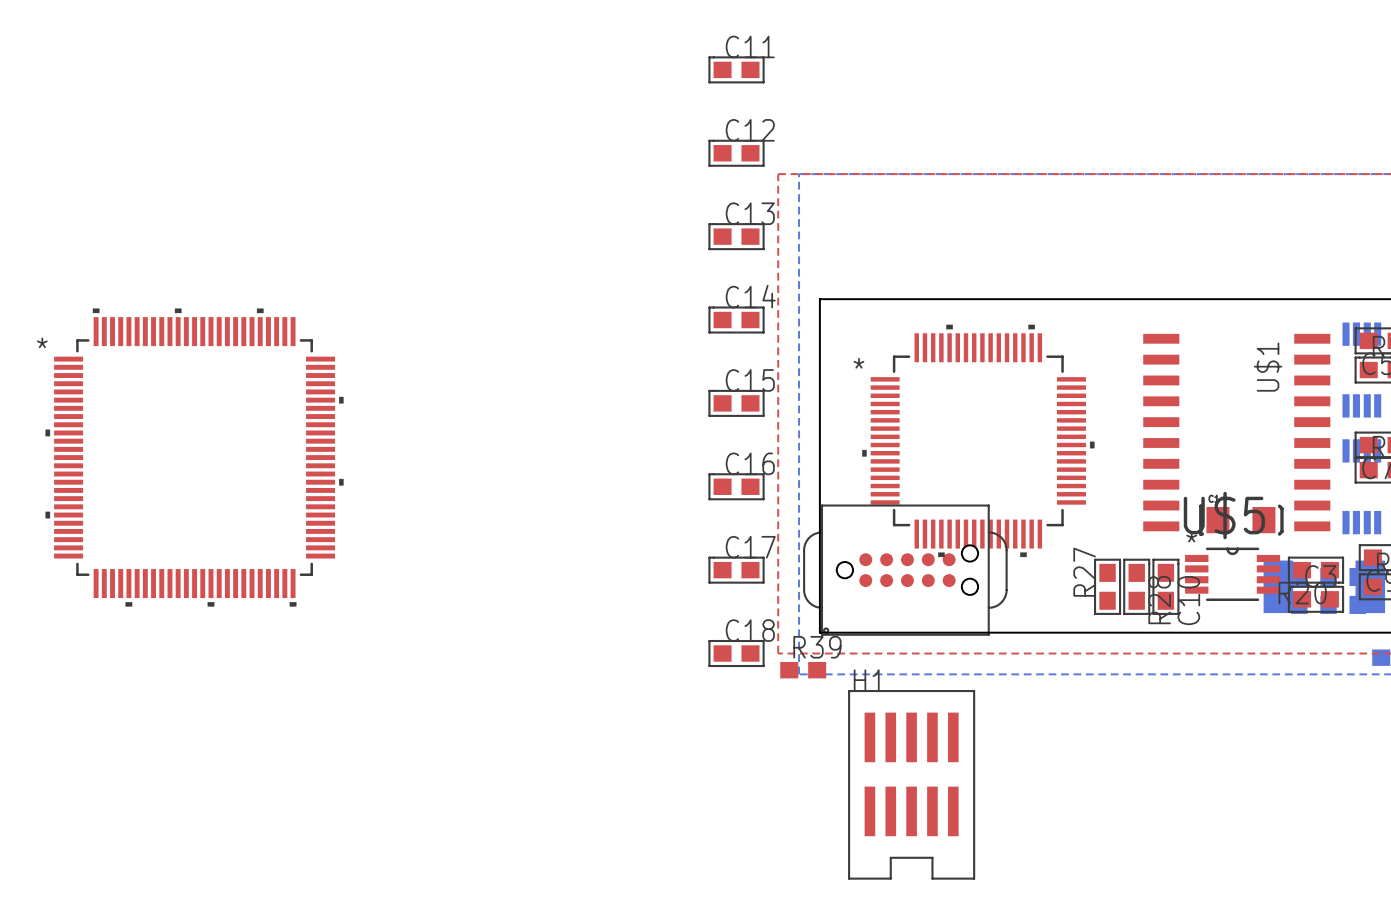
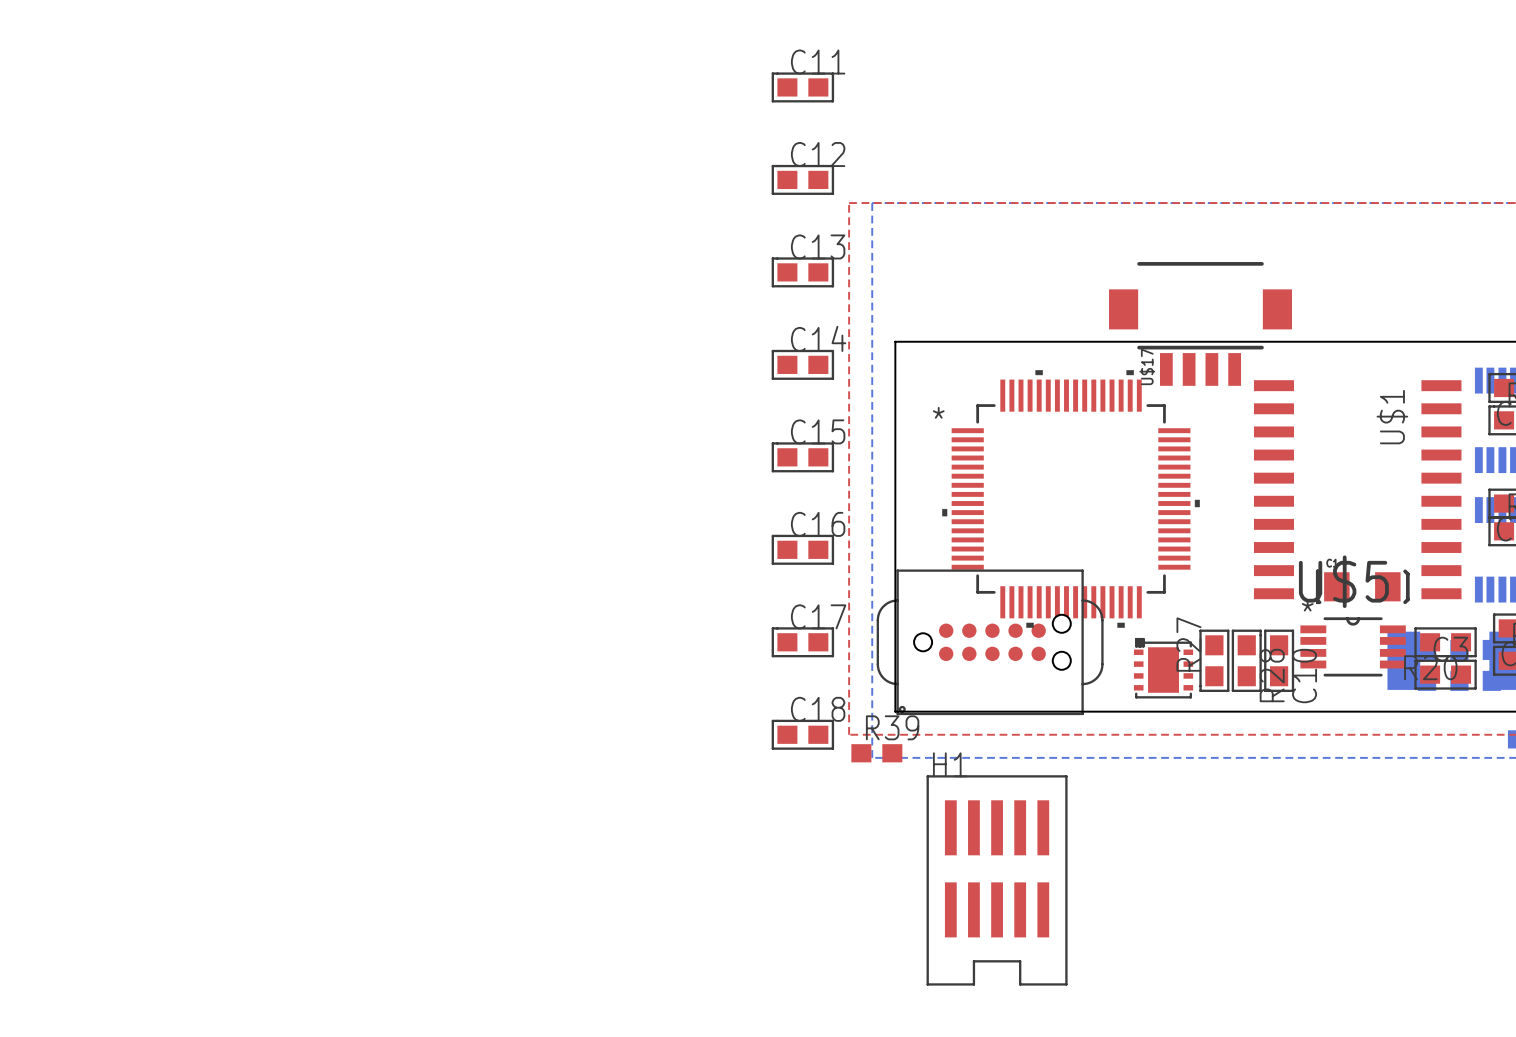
U$17: none -> (1200, 323)
part: (194, 457) -> none
part: none -> (1163, 668)

